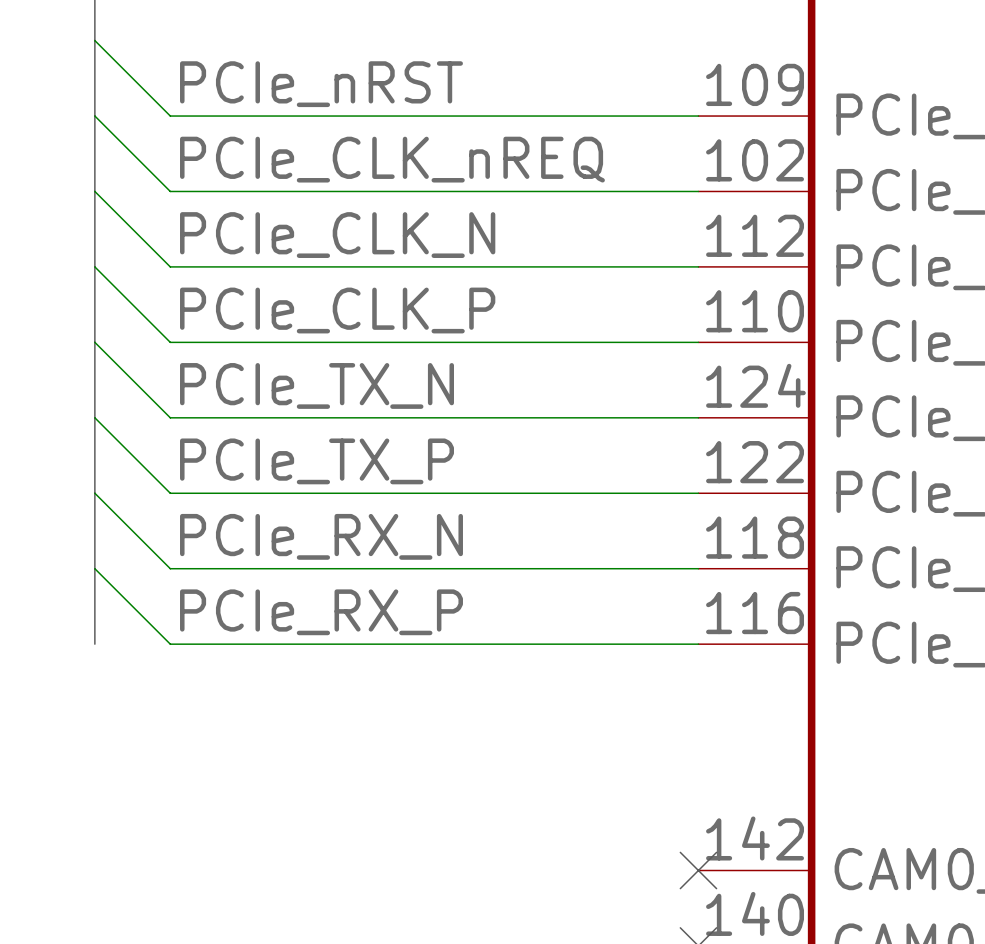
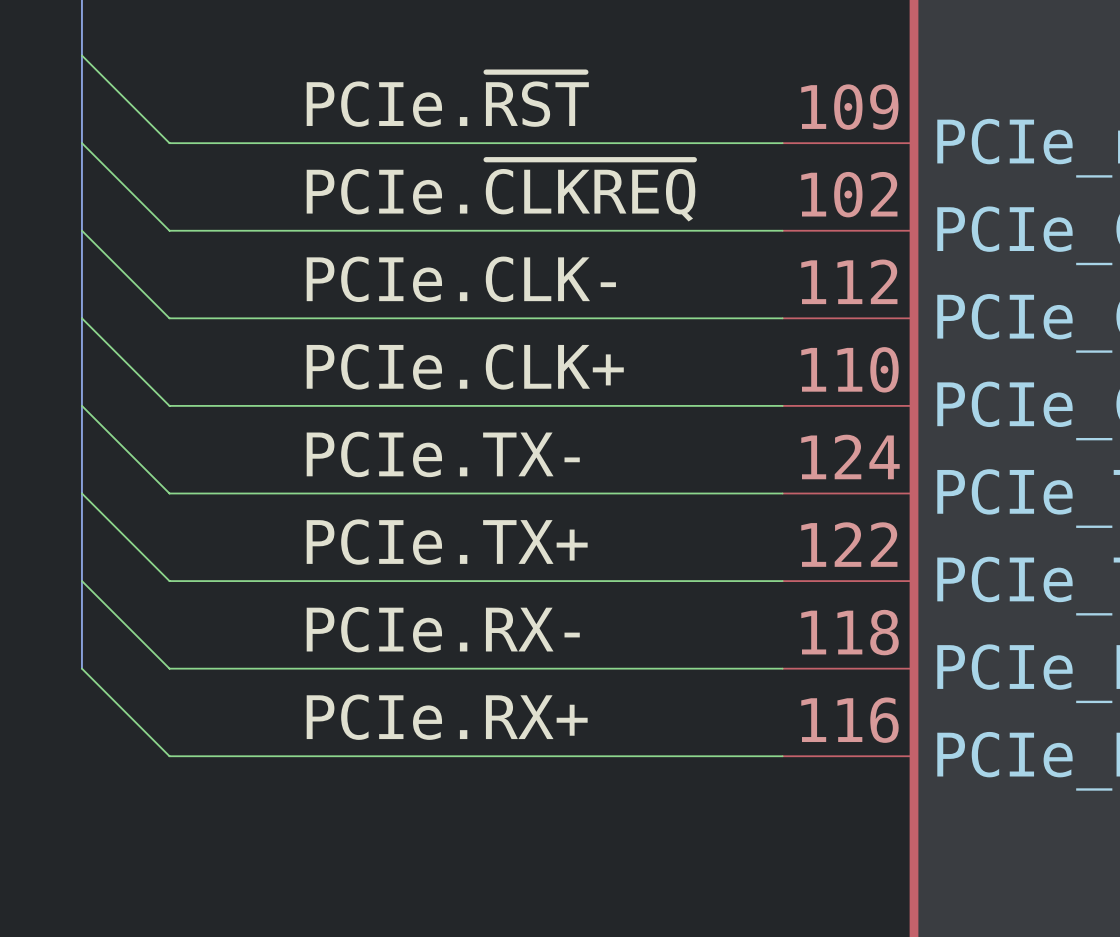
label: PCIe_nRST (321, 84) -> PCIe.~{RST} (447, 99)
label: none -> PCIe.~{CLKREQ} (500, 190)
label: PCIe_CLK_nREQ (392, 159) -> none
label: none -> PCIe.CLK- (461, 279)
label: PCIe_CLK_N (337, 235) -> none
label: none -> PCIe.CLK+ (465, 366)
label: PCIe_CLK_P (337, 310) -> none
label: none -> PCIe.TX- (443, 454)
label: PCIe_TX_N (317, 385) -> none
label: none -> PCIe.TX+ (447, 542)
label: PCIe_TX_P (317, 461) -> none
label: none -> PCIe.RX- (443, 629)
label: PCIe_RX_N (321, 536) -> none
bus: (94, 568) (94, 644) -> none
label: none -> PCIe.RX+ (447, 717)
label: PCIe_RX_P (321, 612) -> none

